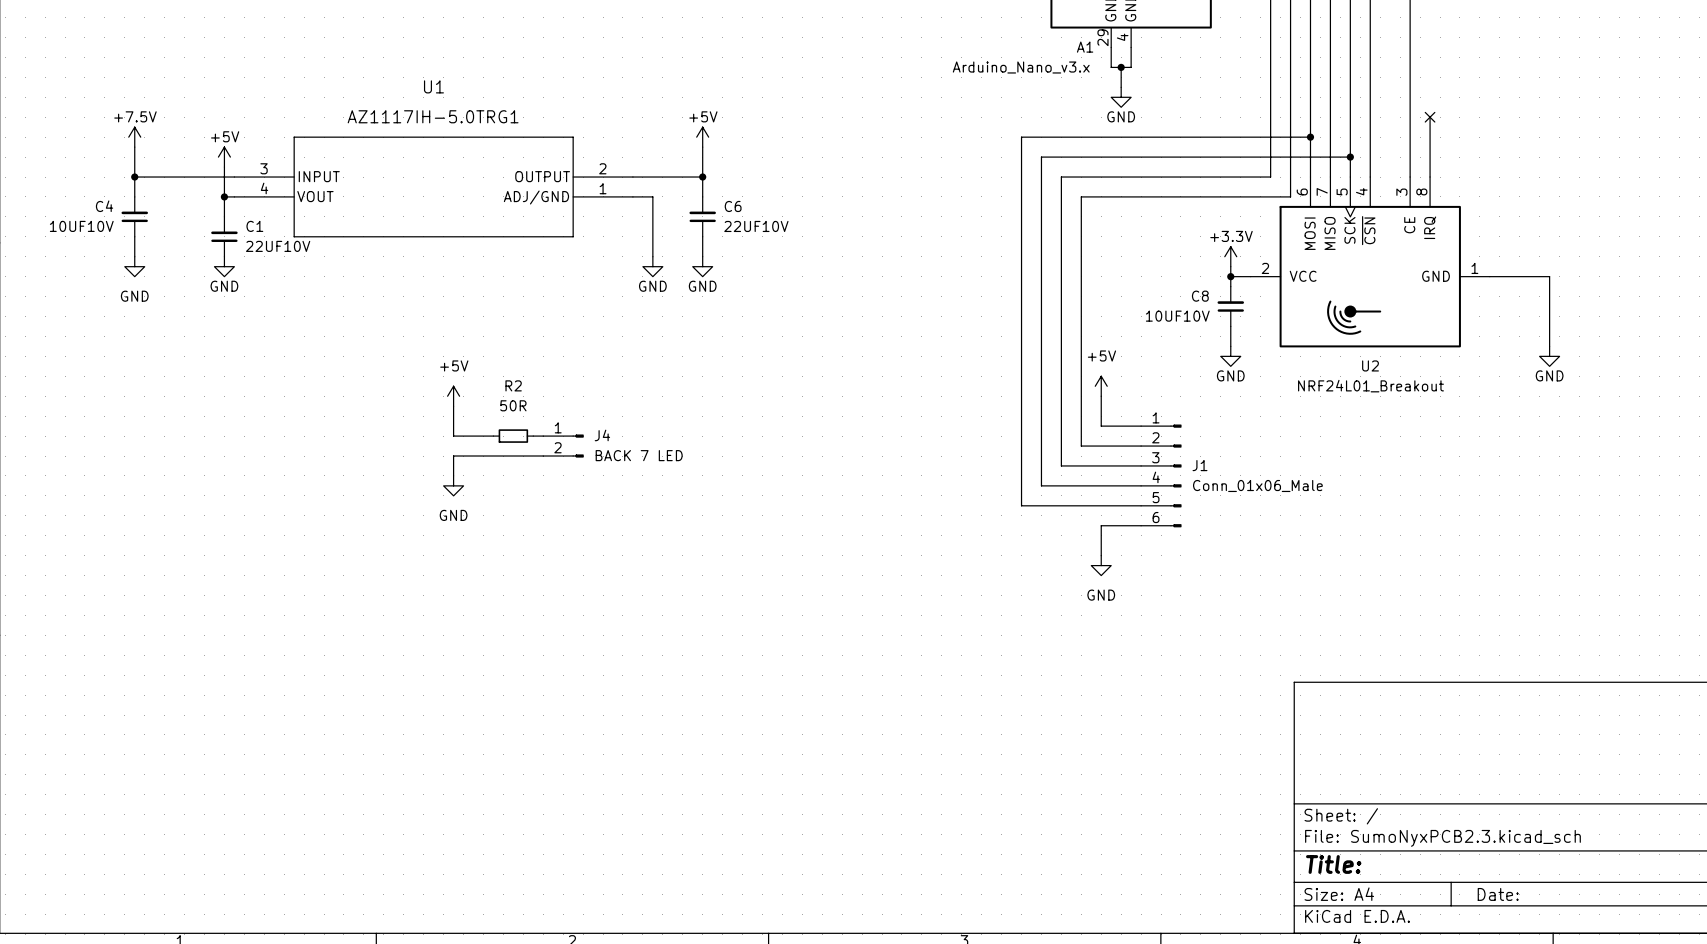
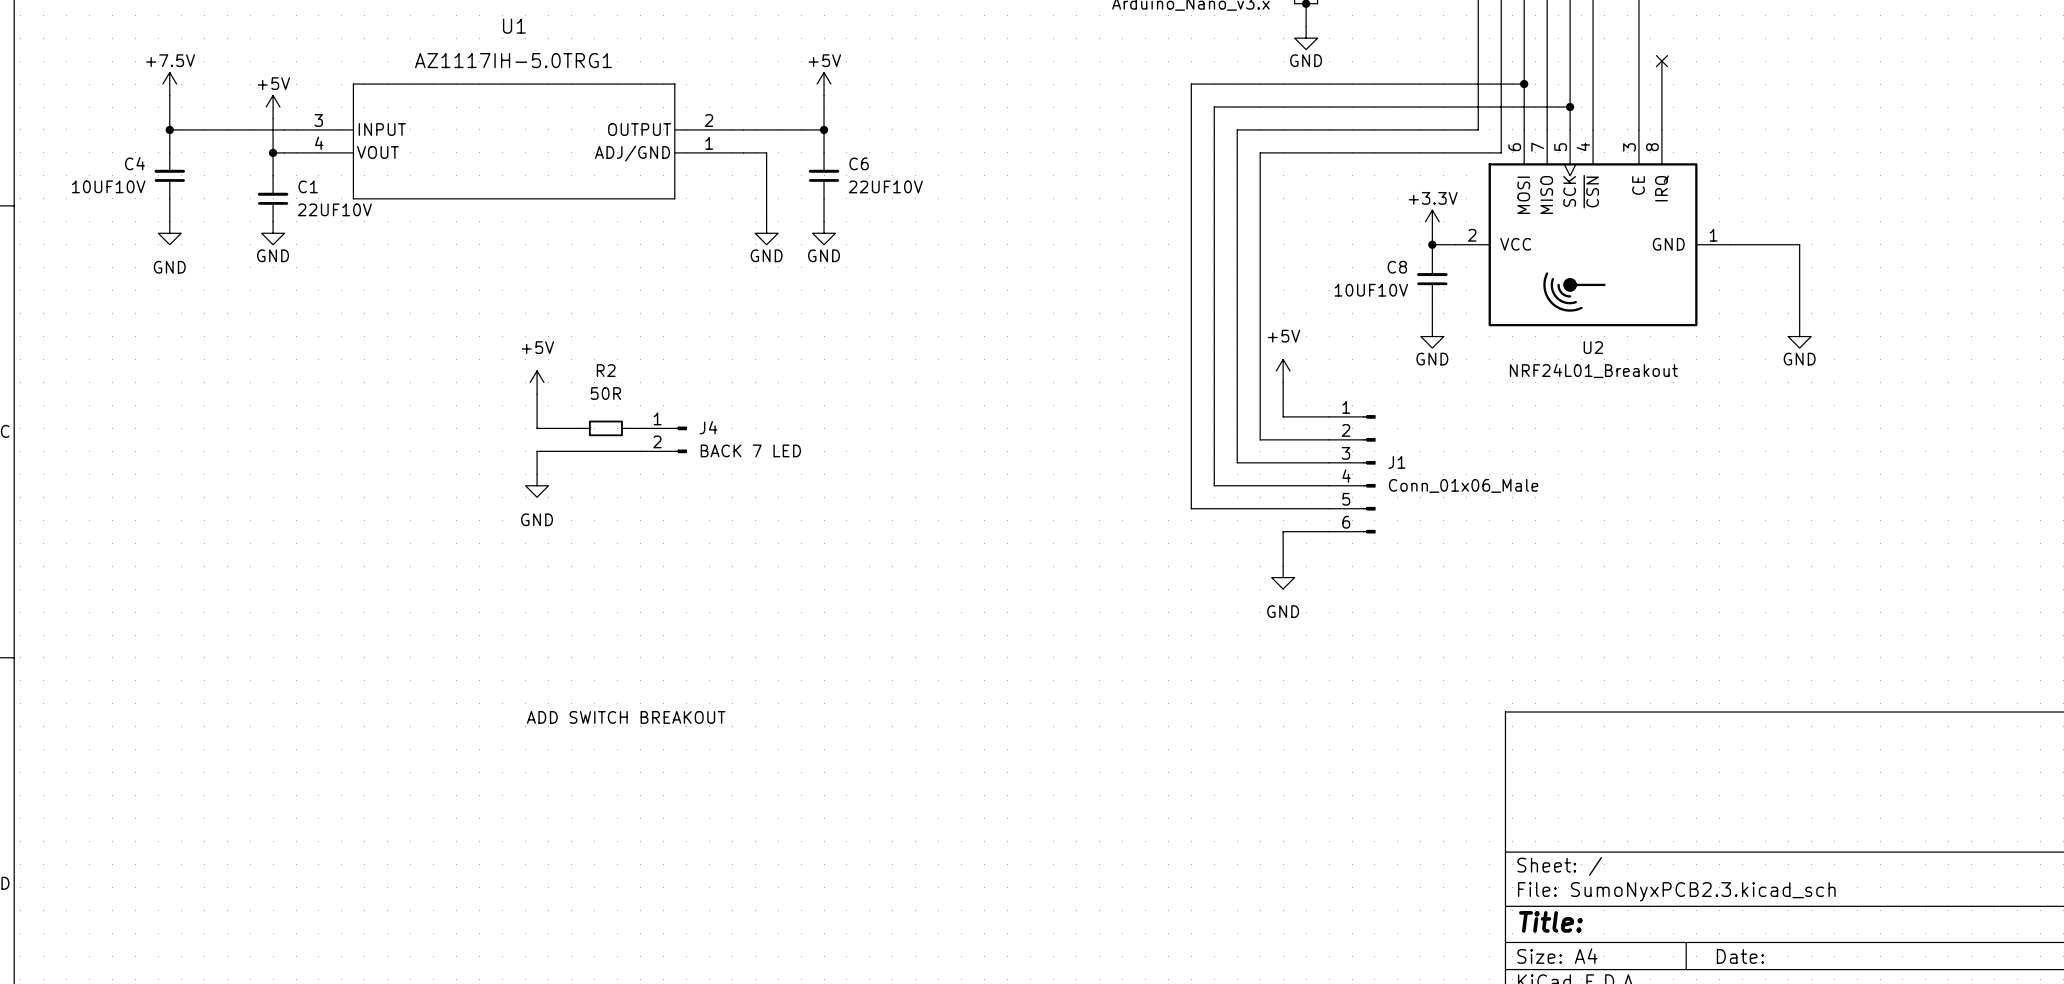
text: none -> ADD SWITCH BREAKOUT (626, 717)

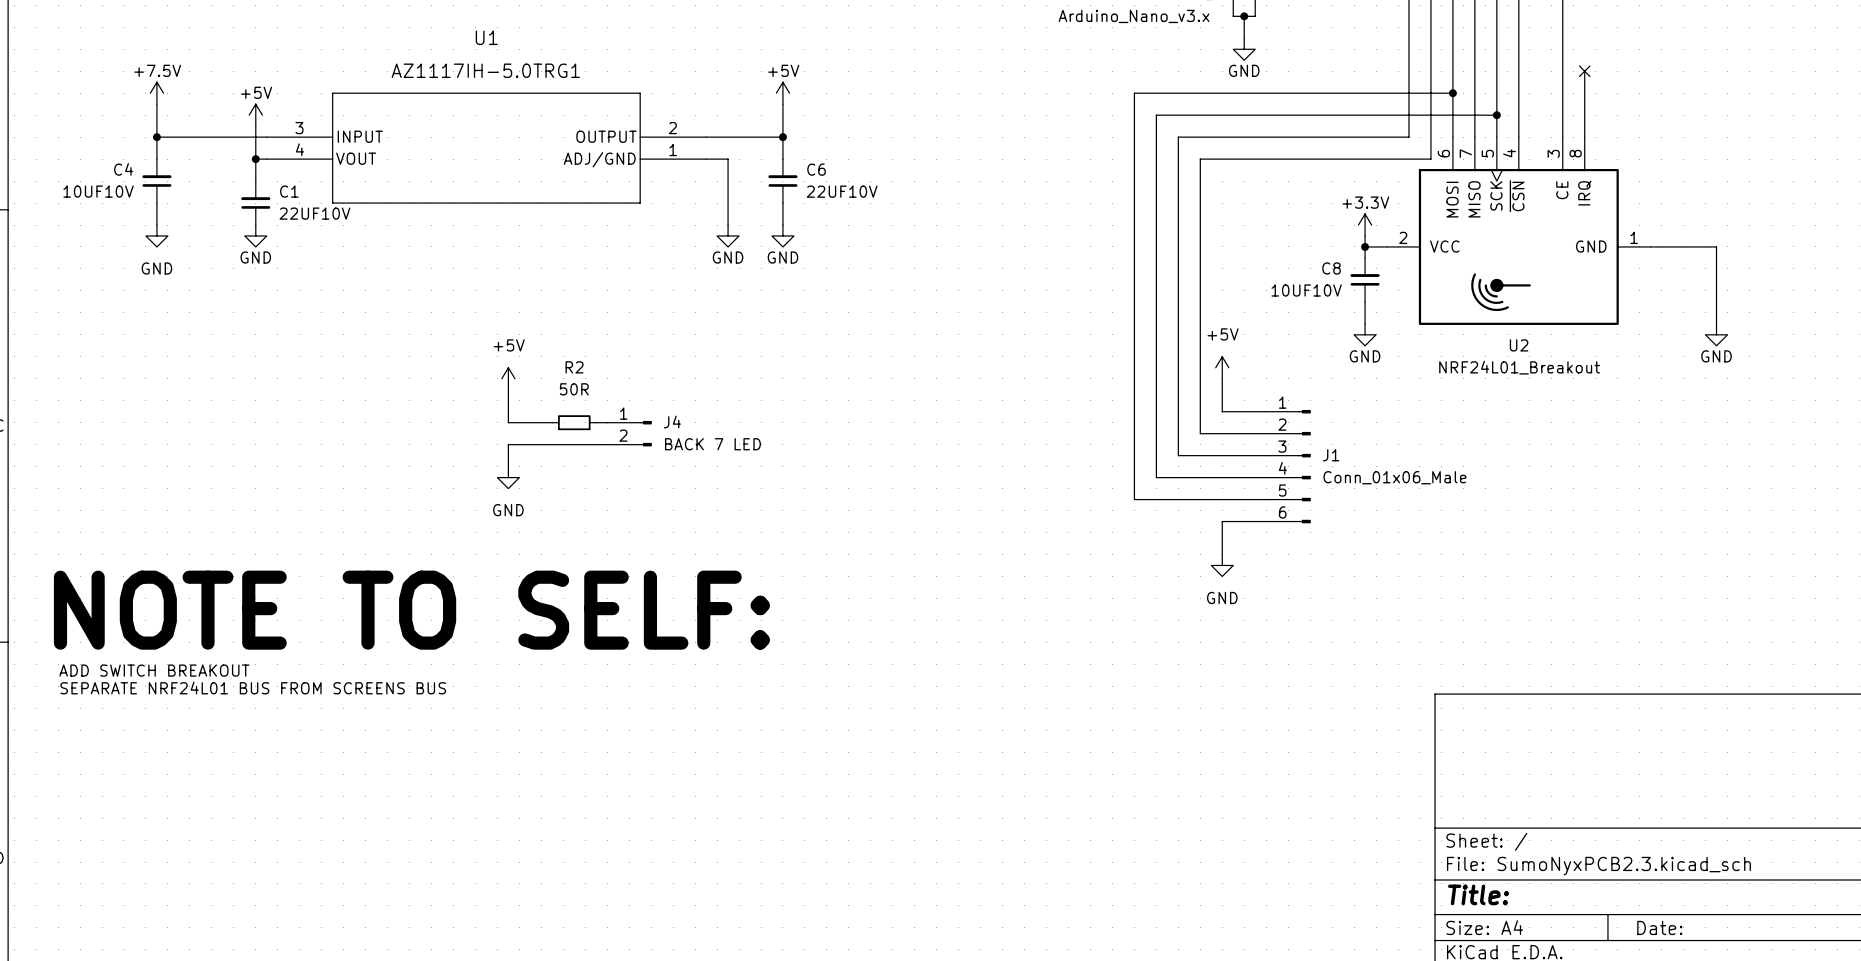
text: none -> NOTE TO SELF: (411, 610)
text: none -> ADD SWITCH BREAKOUT (154, 670)
text: none -> SEPARATE NRF24L01 BUS FROM SCREENS BUS (253, 688)
text: ADD SWITCH BREAKOUT (626, 717) -> none

